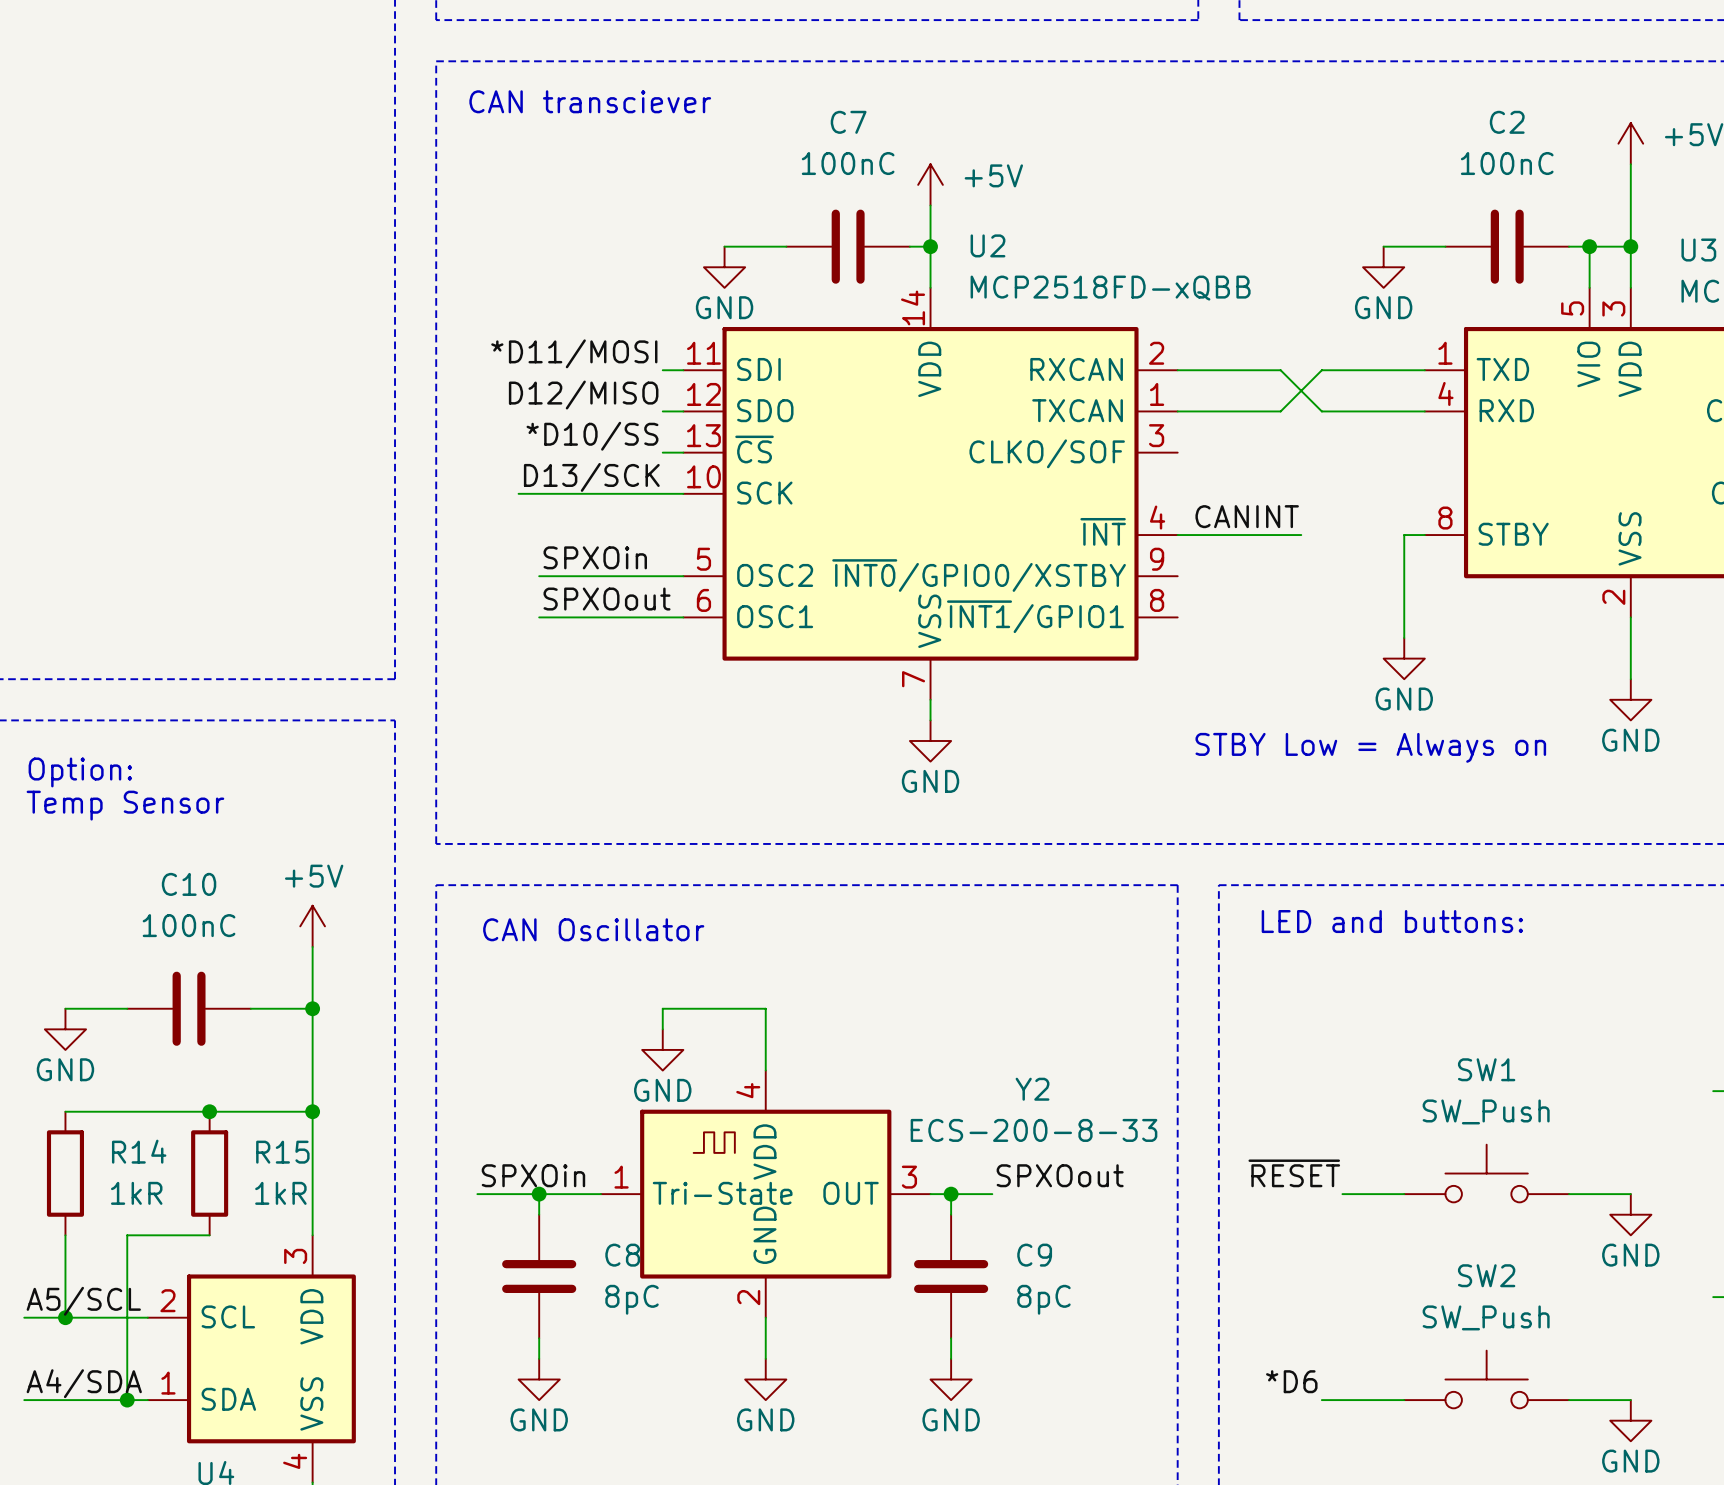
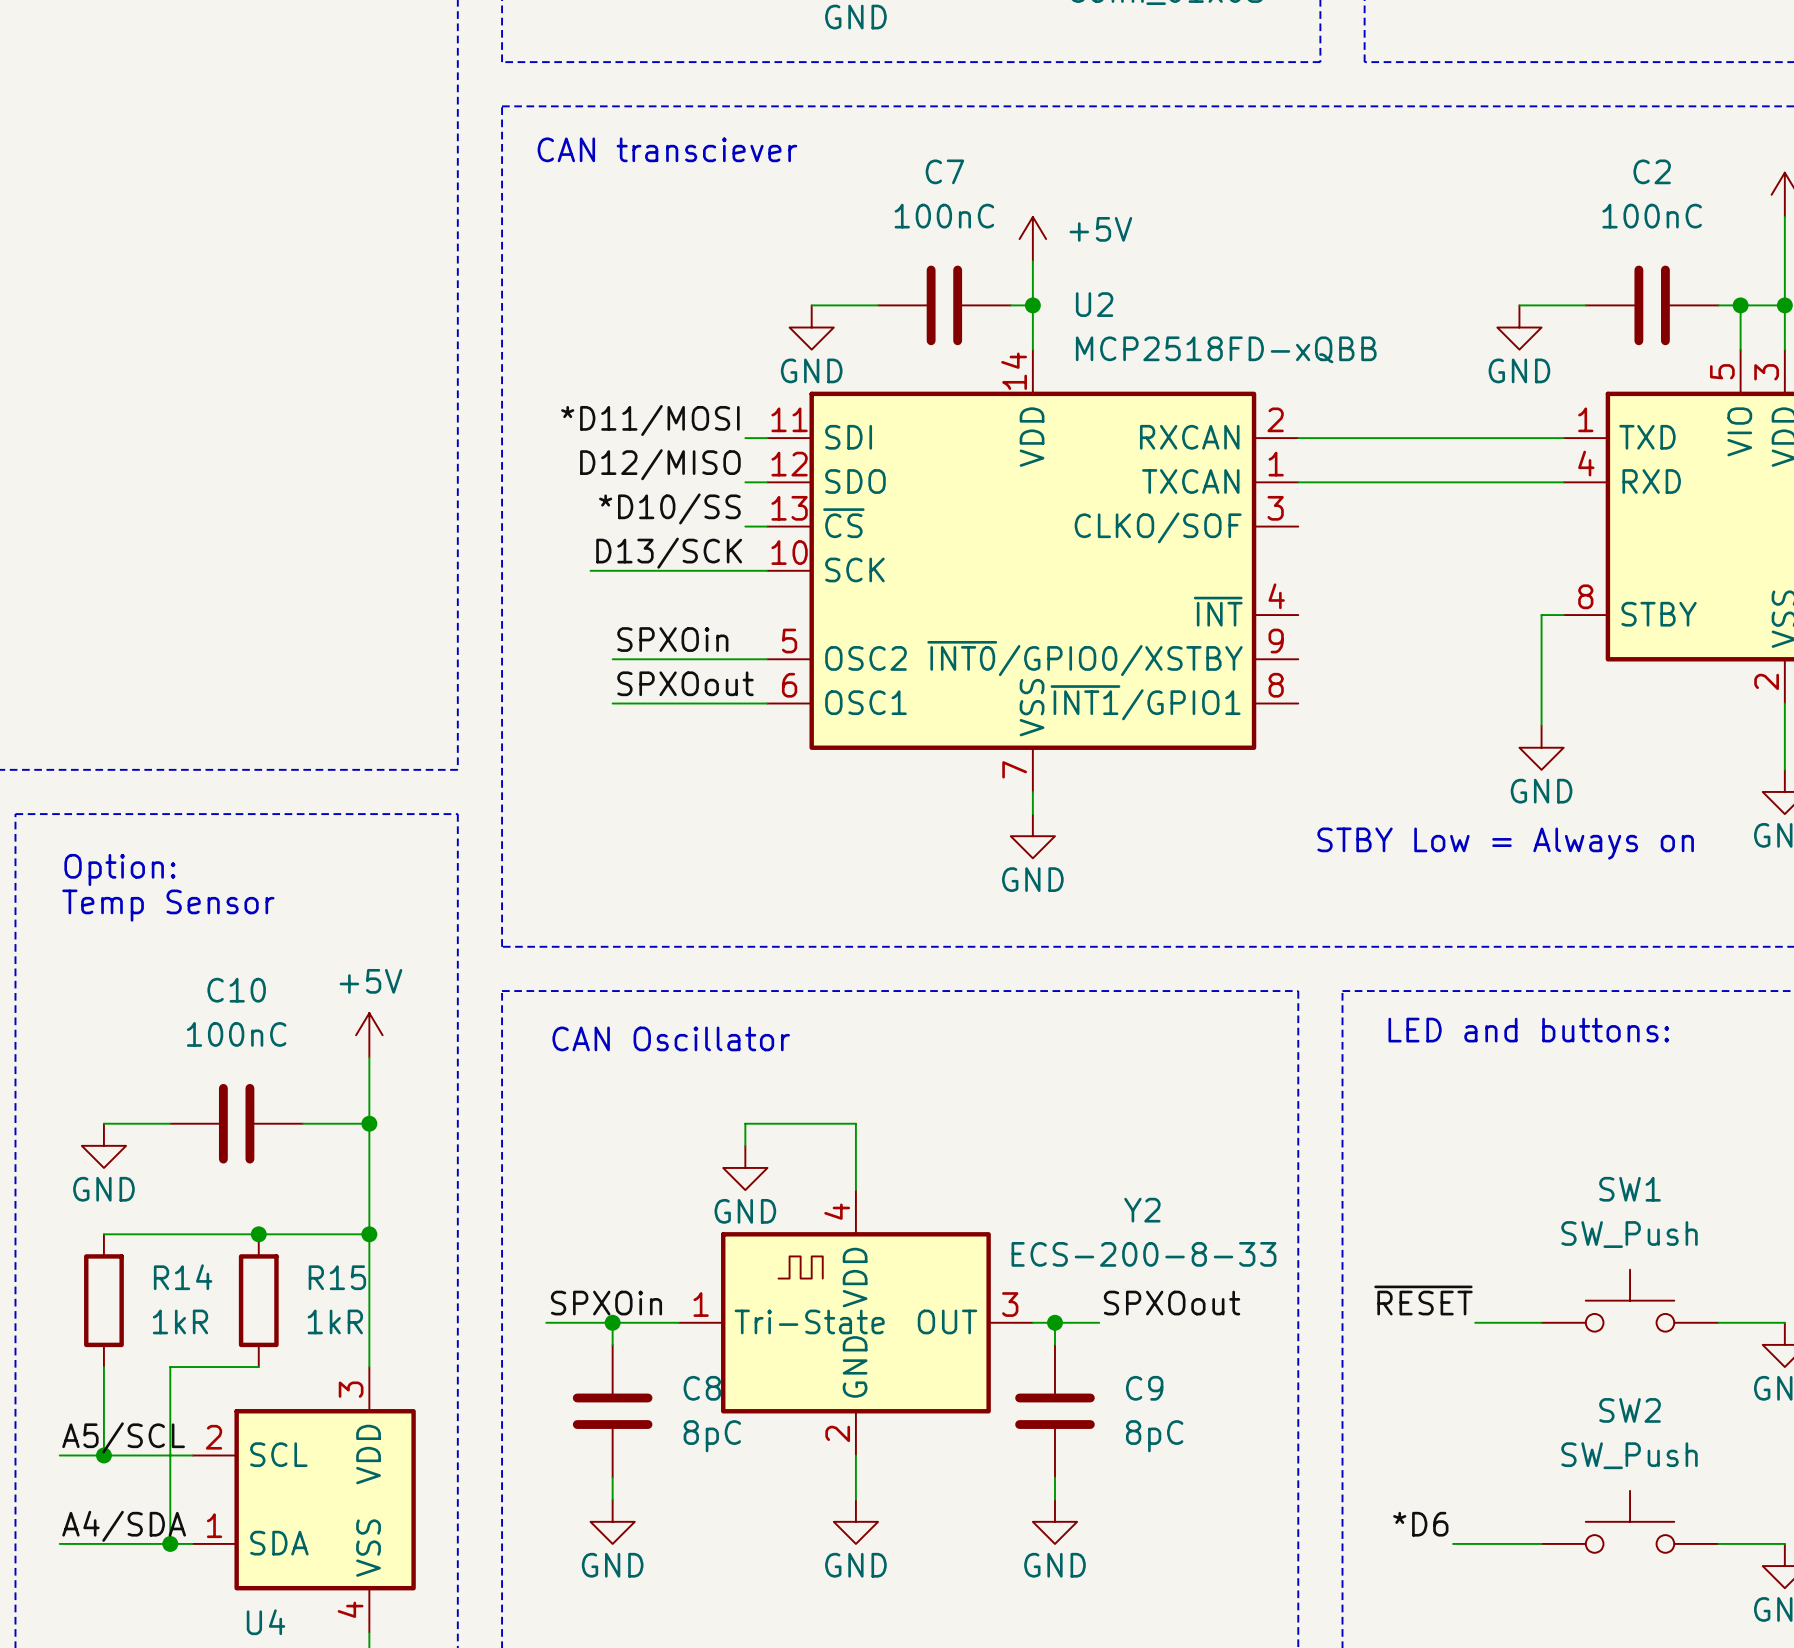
wire: (1280, 370) (1321, 411) -> (1408, 438) (1453, 438)
wire: (1321, 370) (1280, 411) -> (1453, 482) (1408, 482)
label: CANINT (1247, 516) -> none
wire: (1177, 535) (1301, 535) -> none

